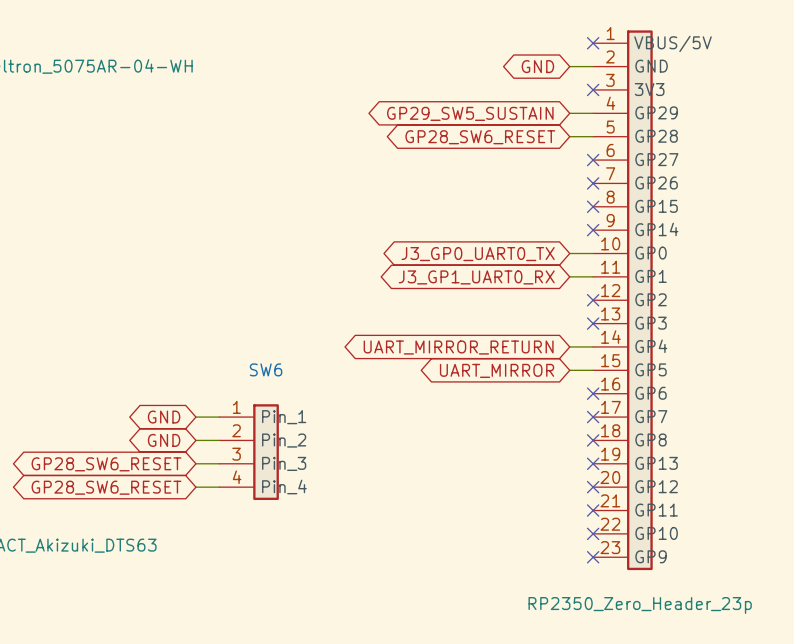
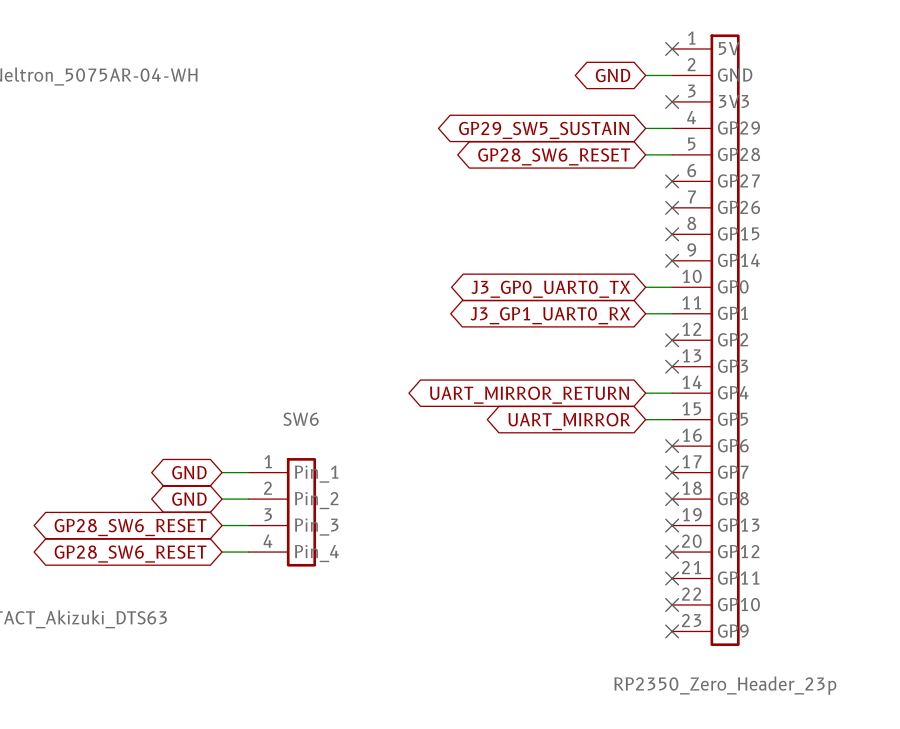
part pin name: VBUS/5V (673, 43) -> 5V (729, 48)

